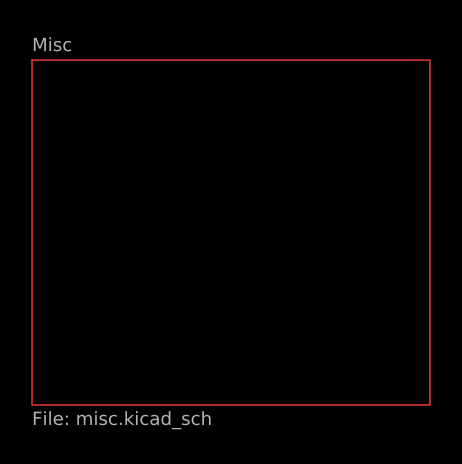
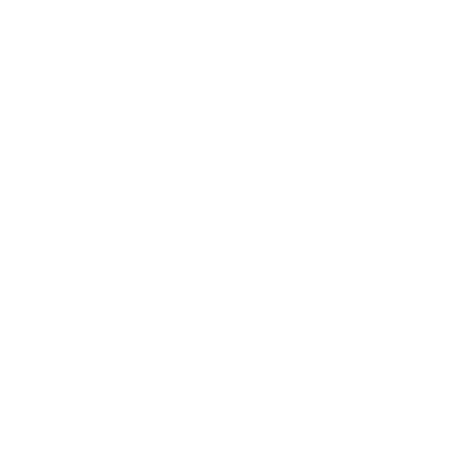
sheet Misc: File: misc.kicad_sch (230, 232) -> none

